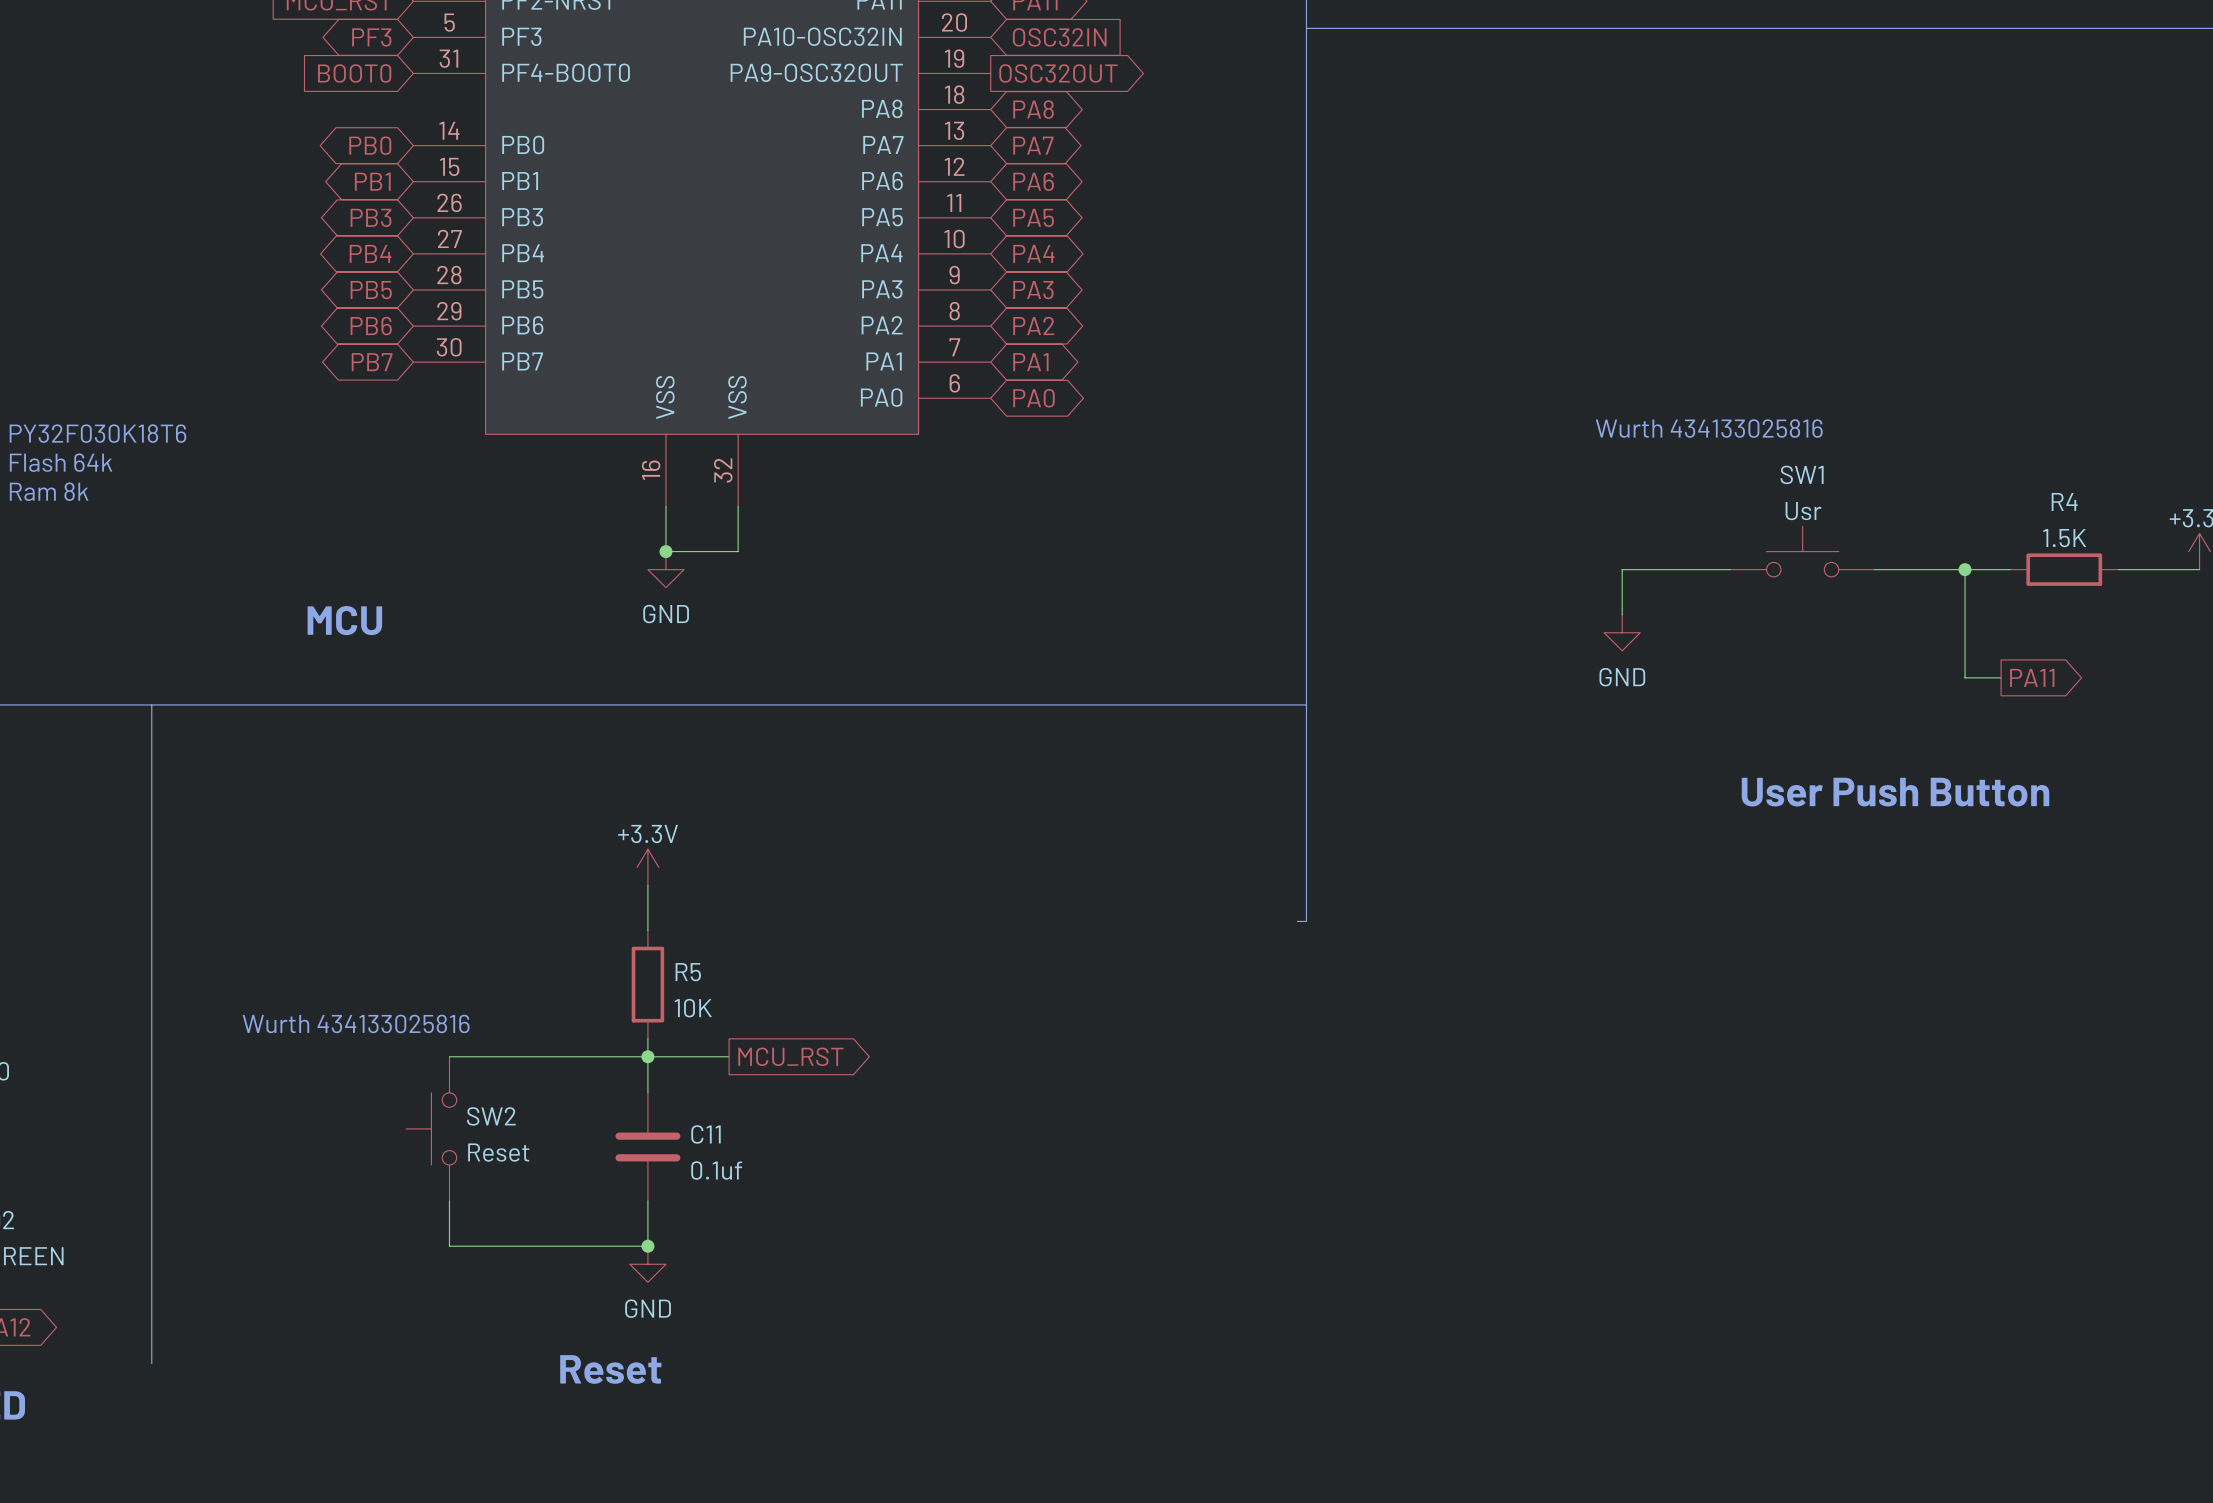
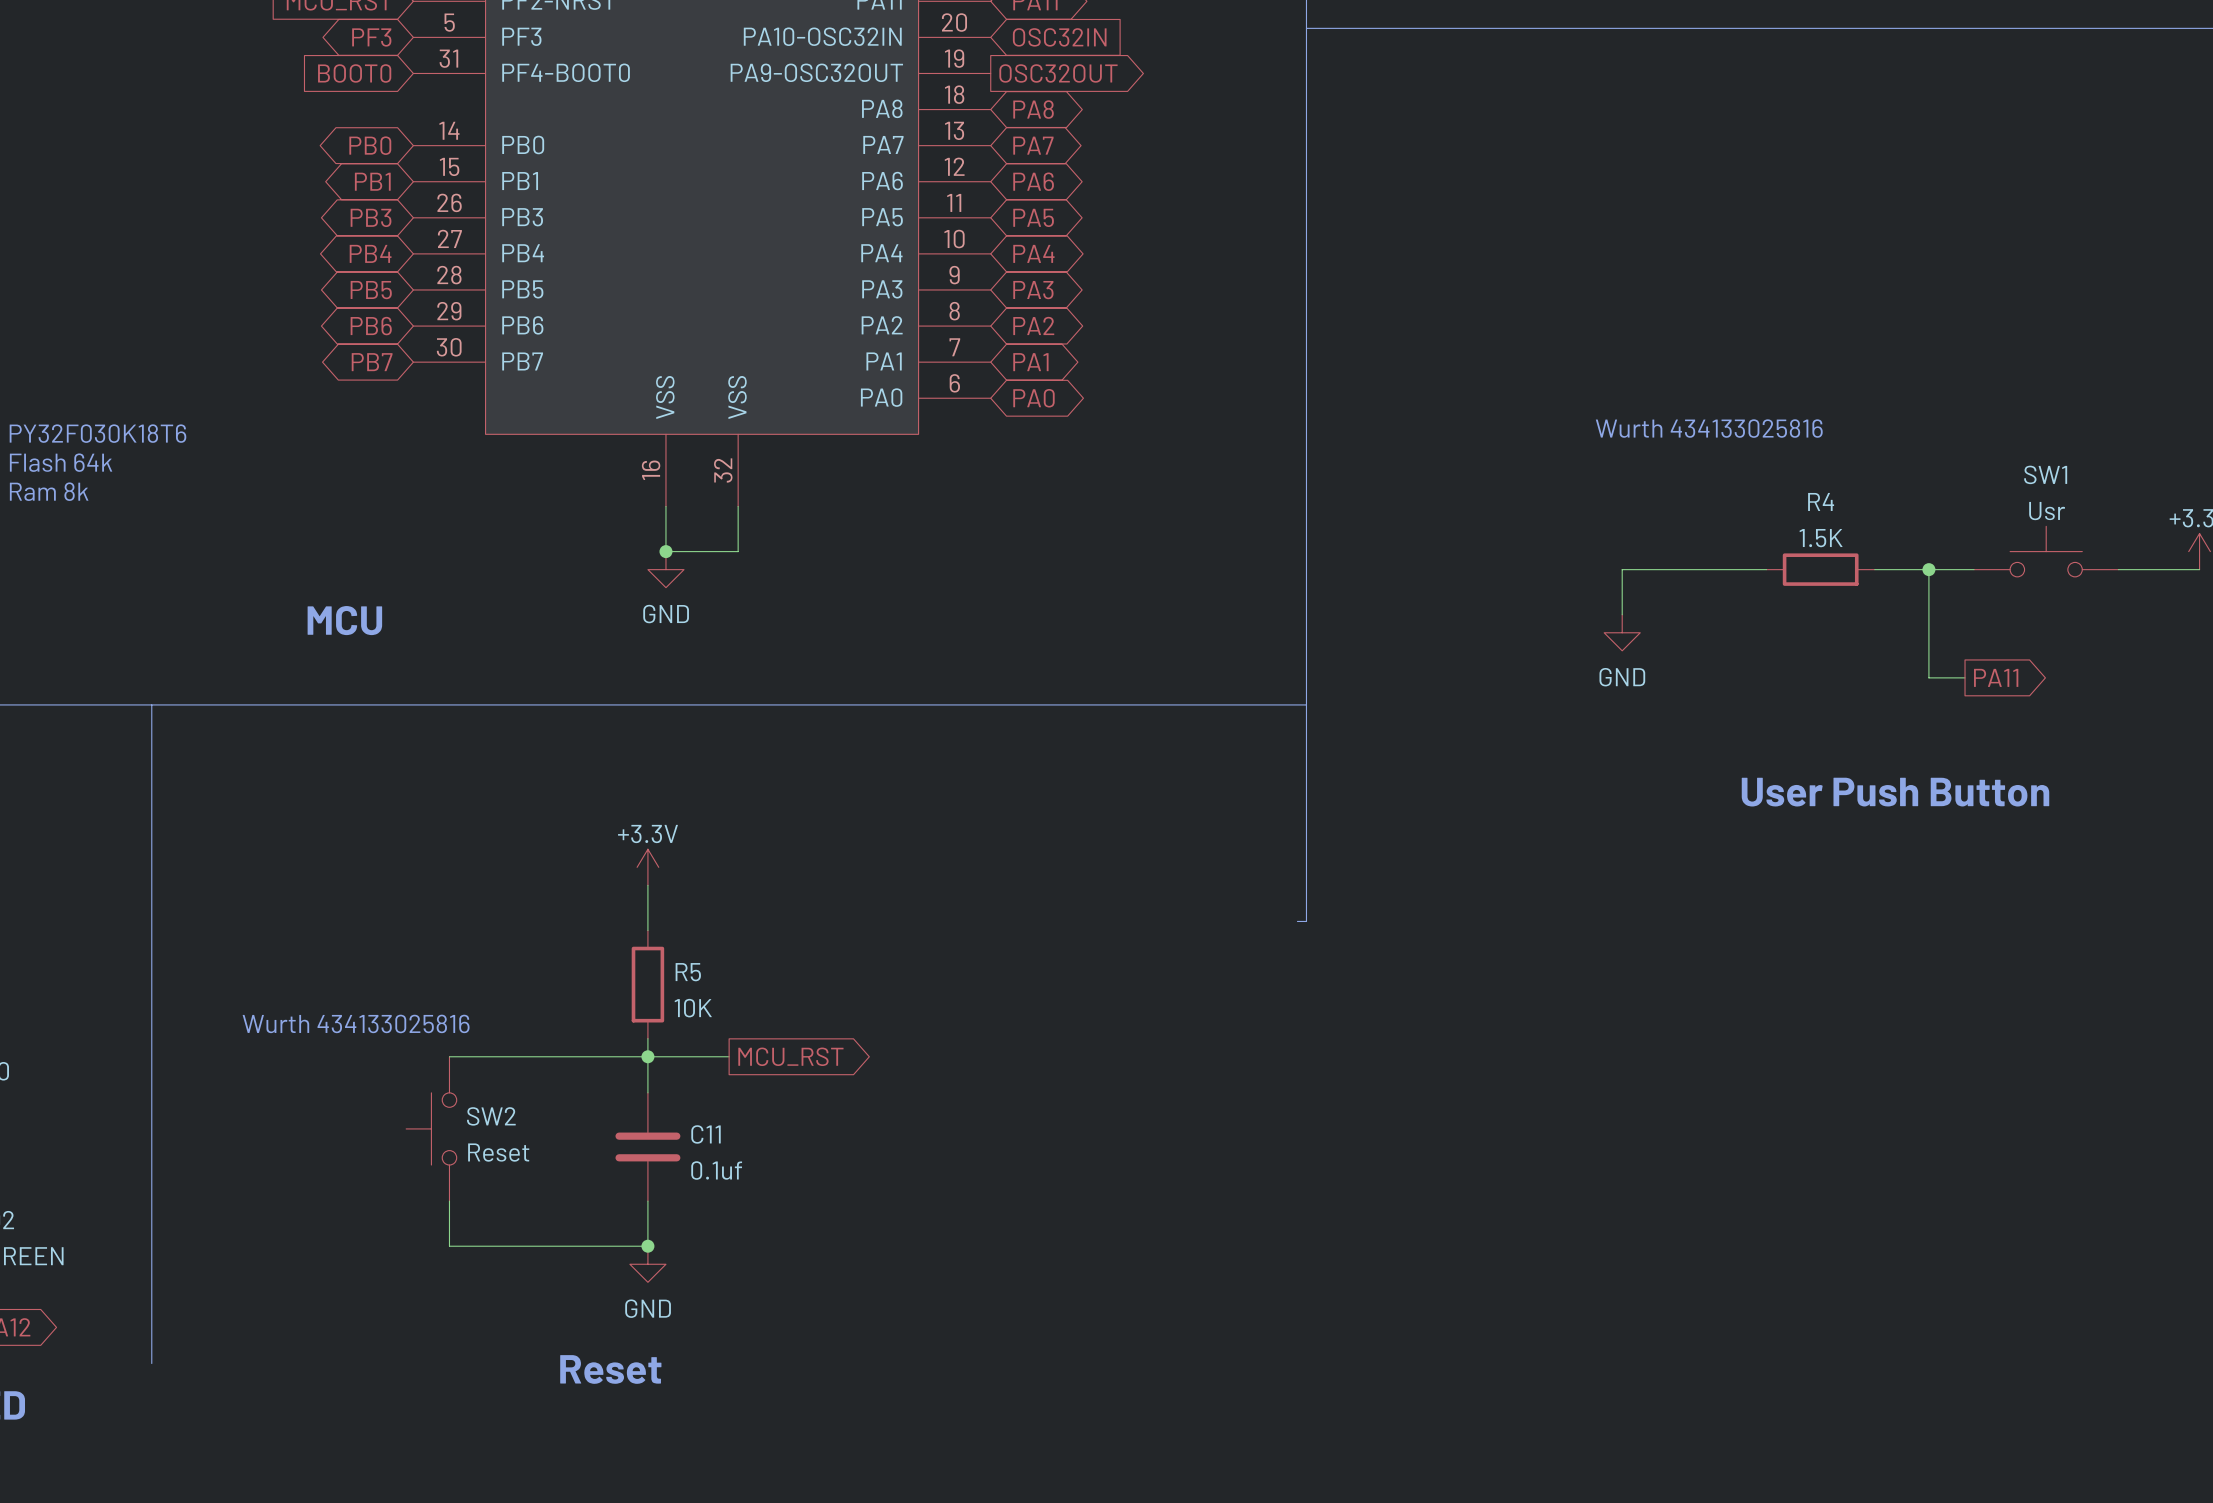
SW1 position: (1802, 551) -> (2046, 551)
wire: (1965, 569) (1965, 677) (2001, 677) -> (1928, 569) (1928, 677) (1965, 677)
junction position: (1965, 569) -> (1928, 569)
R4 position: (2064, 569) -> (1820, 569)
global label position: PA11 (2032, 677) -> PA11 (1996, 677)

